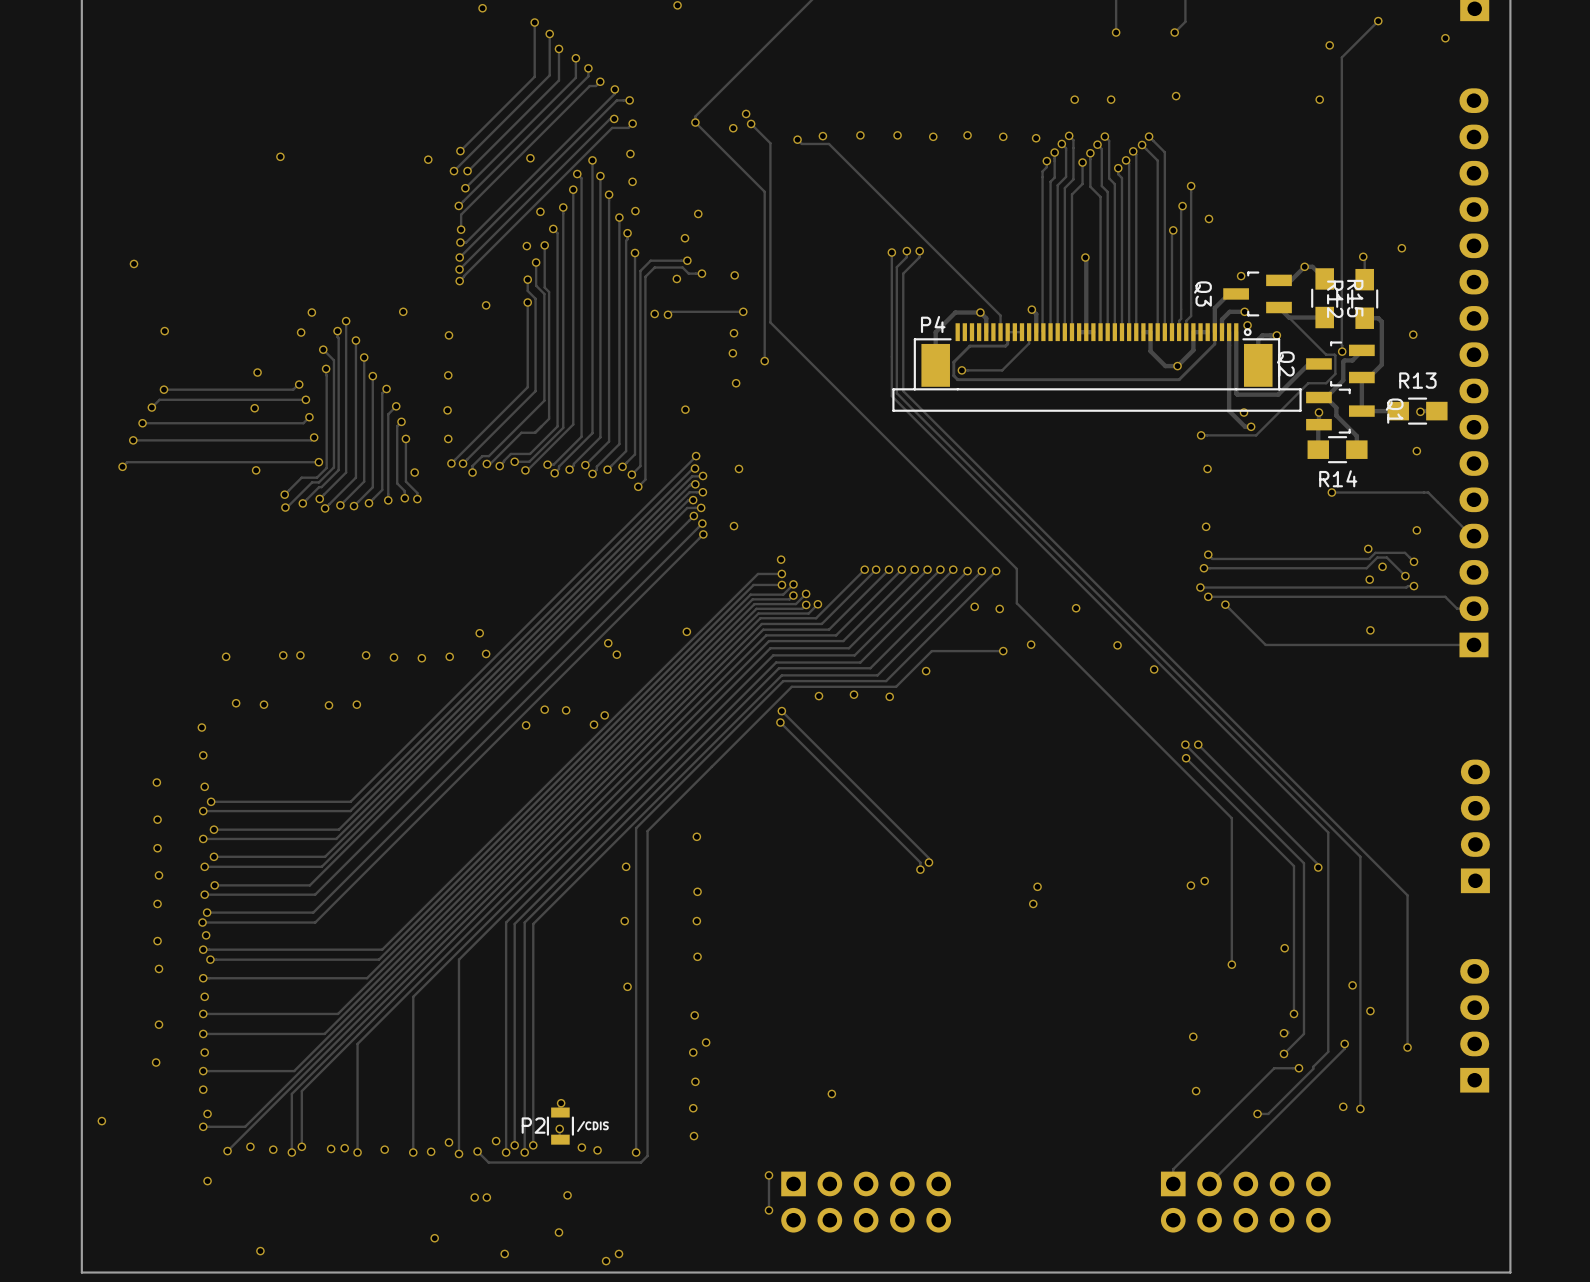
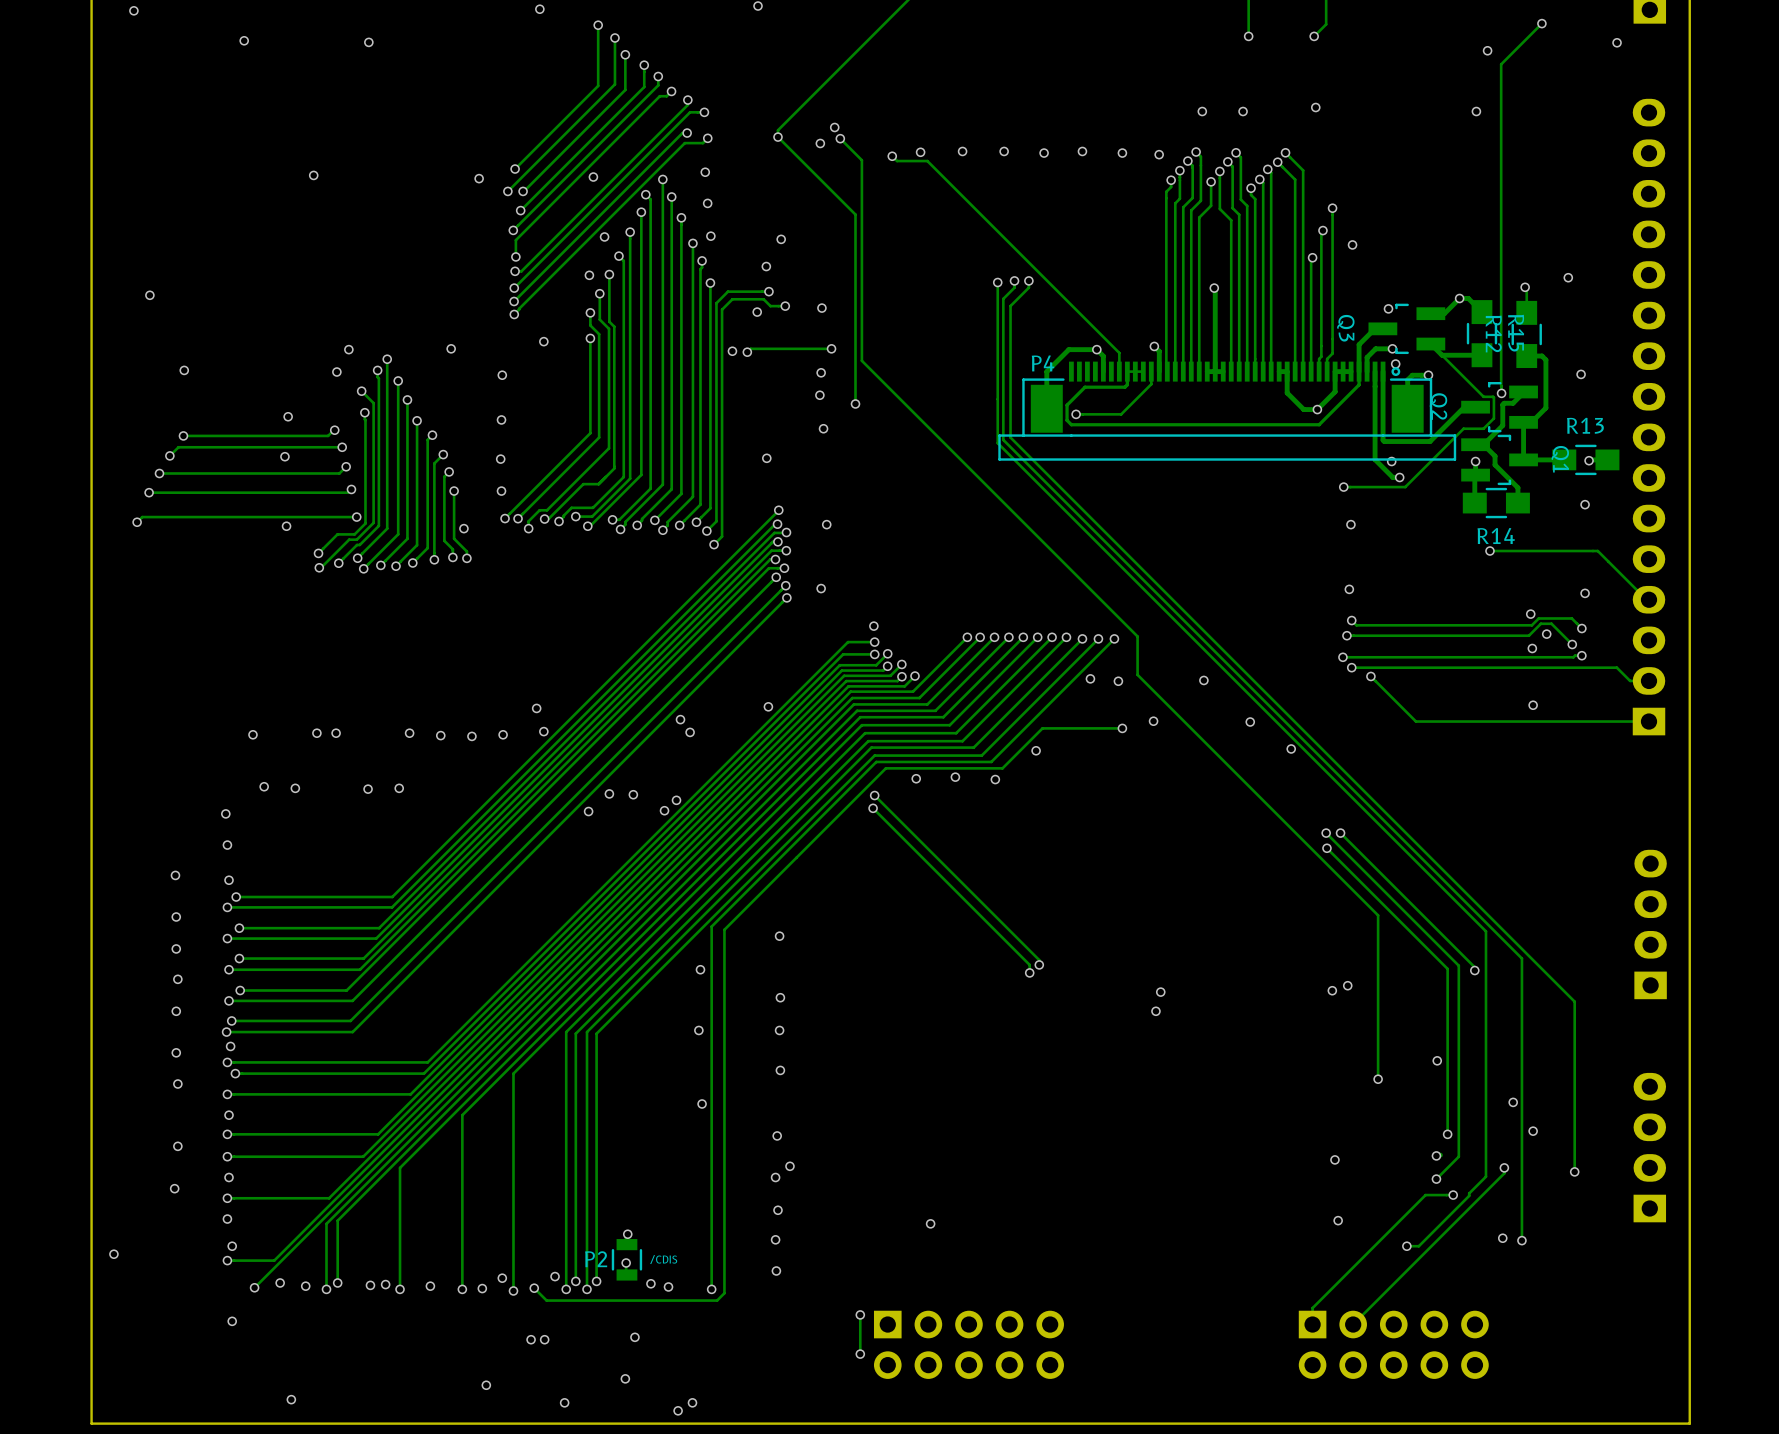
via: none -> (133, 10)
via: none -> (244, 40)
via: none -> (368, 42)

